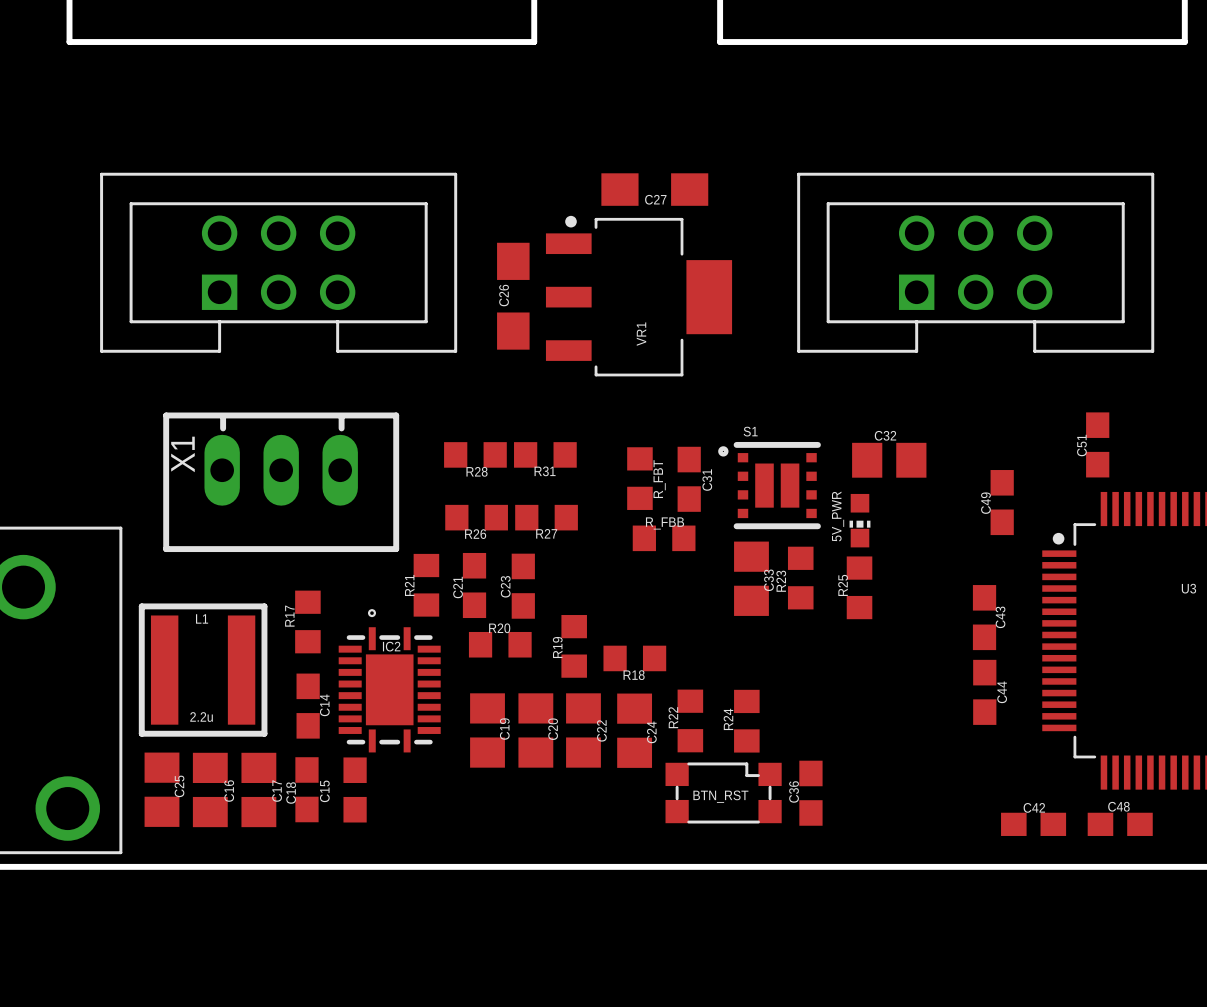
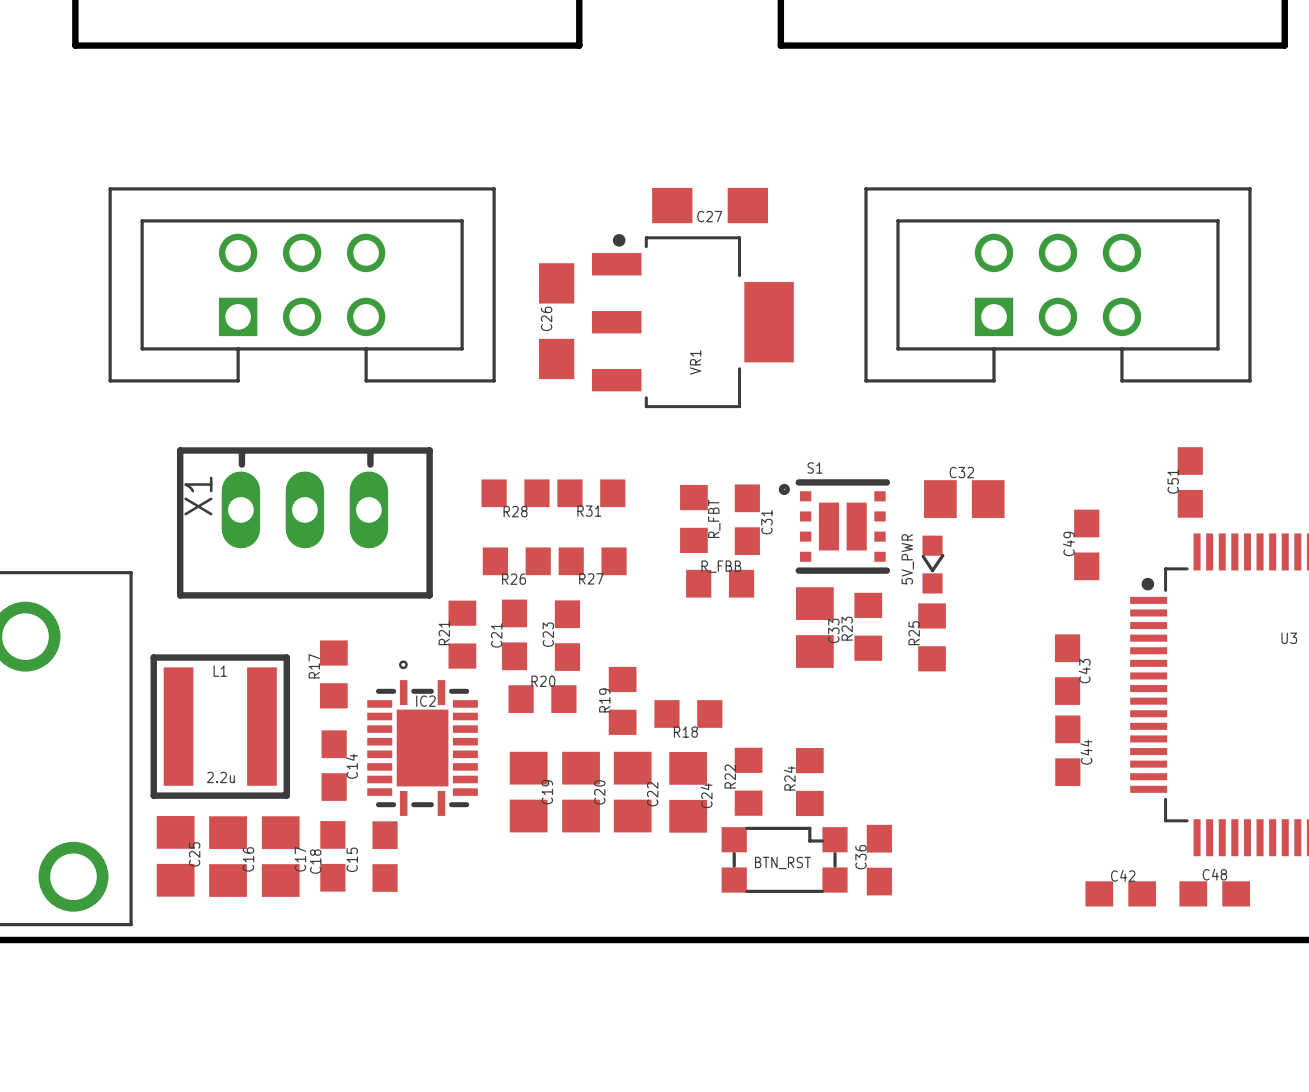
5V_PWR footprint: [849, 493, 871, 548] -> [921, 535, 945, 594]

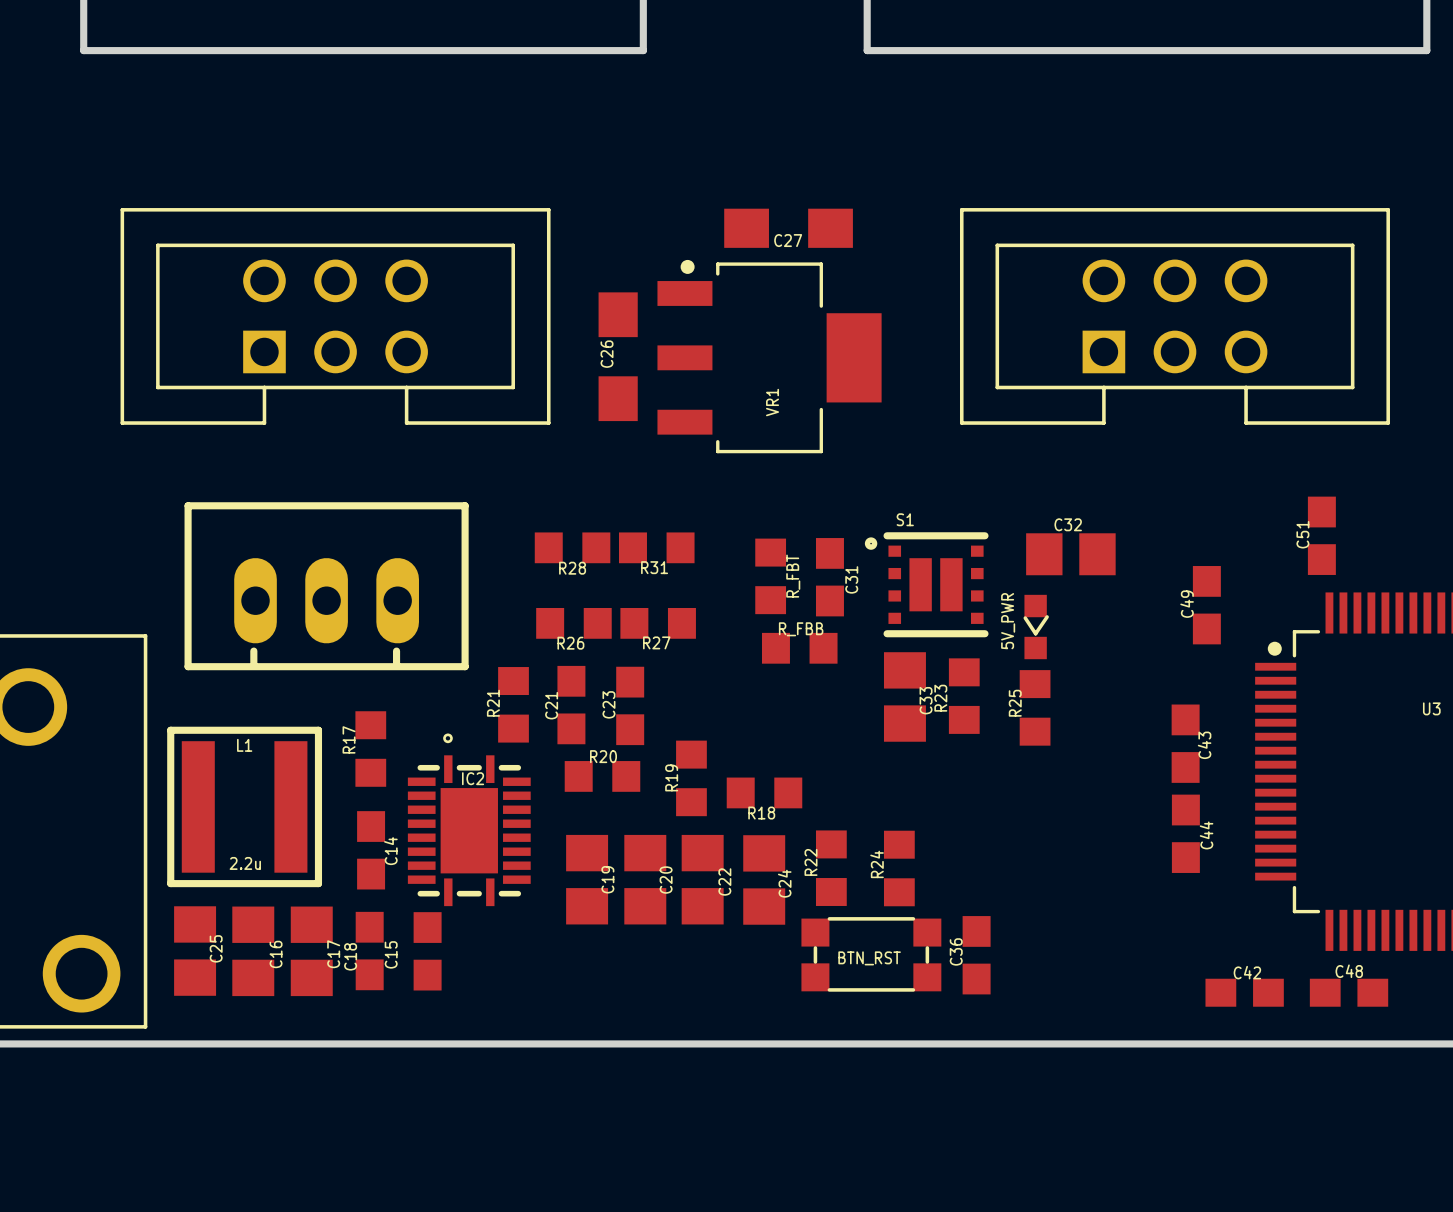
X1: (304, 522) -> none
part: none -> (326, 586)
BTN_RST footprint: [721, 826, 848, 893] -> [801, 917, 942, 992]

